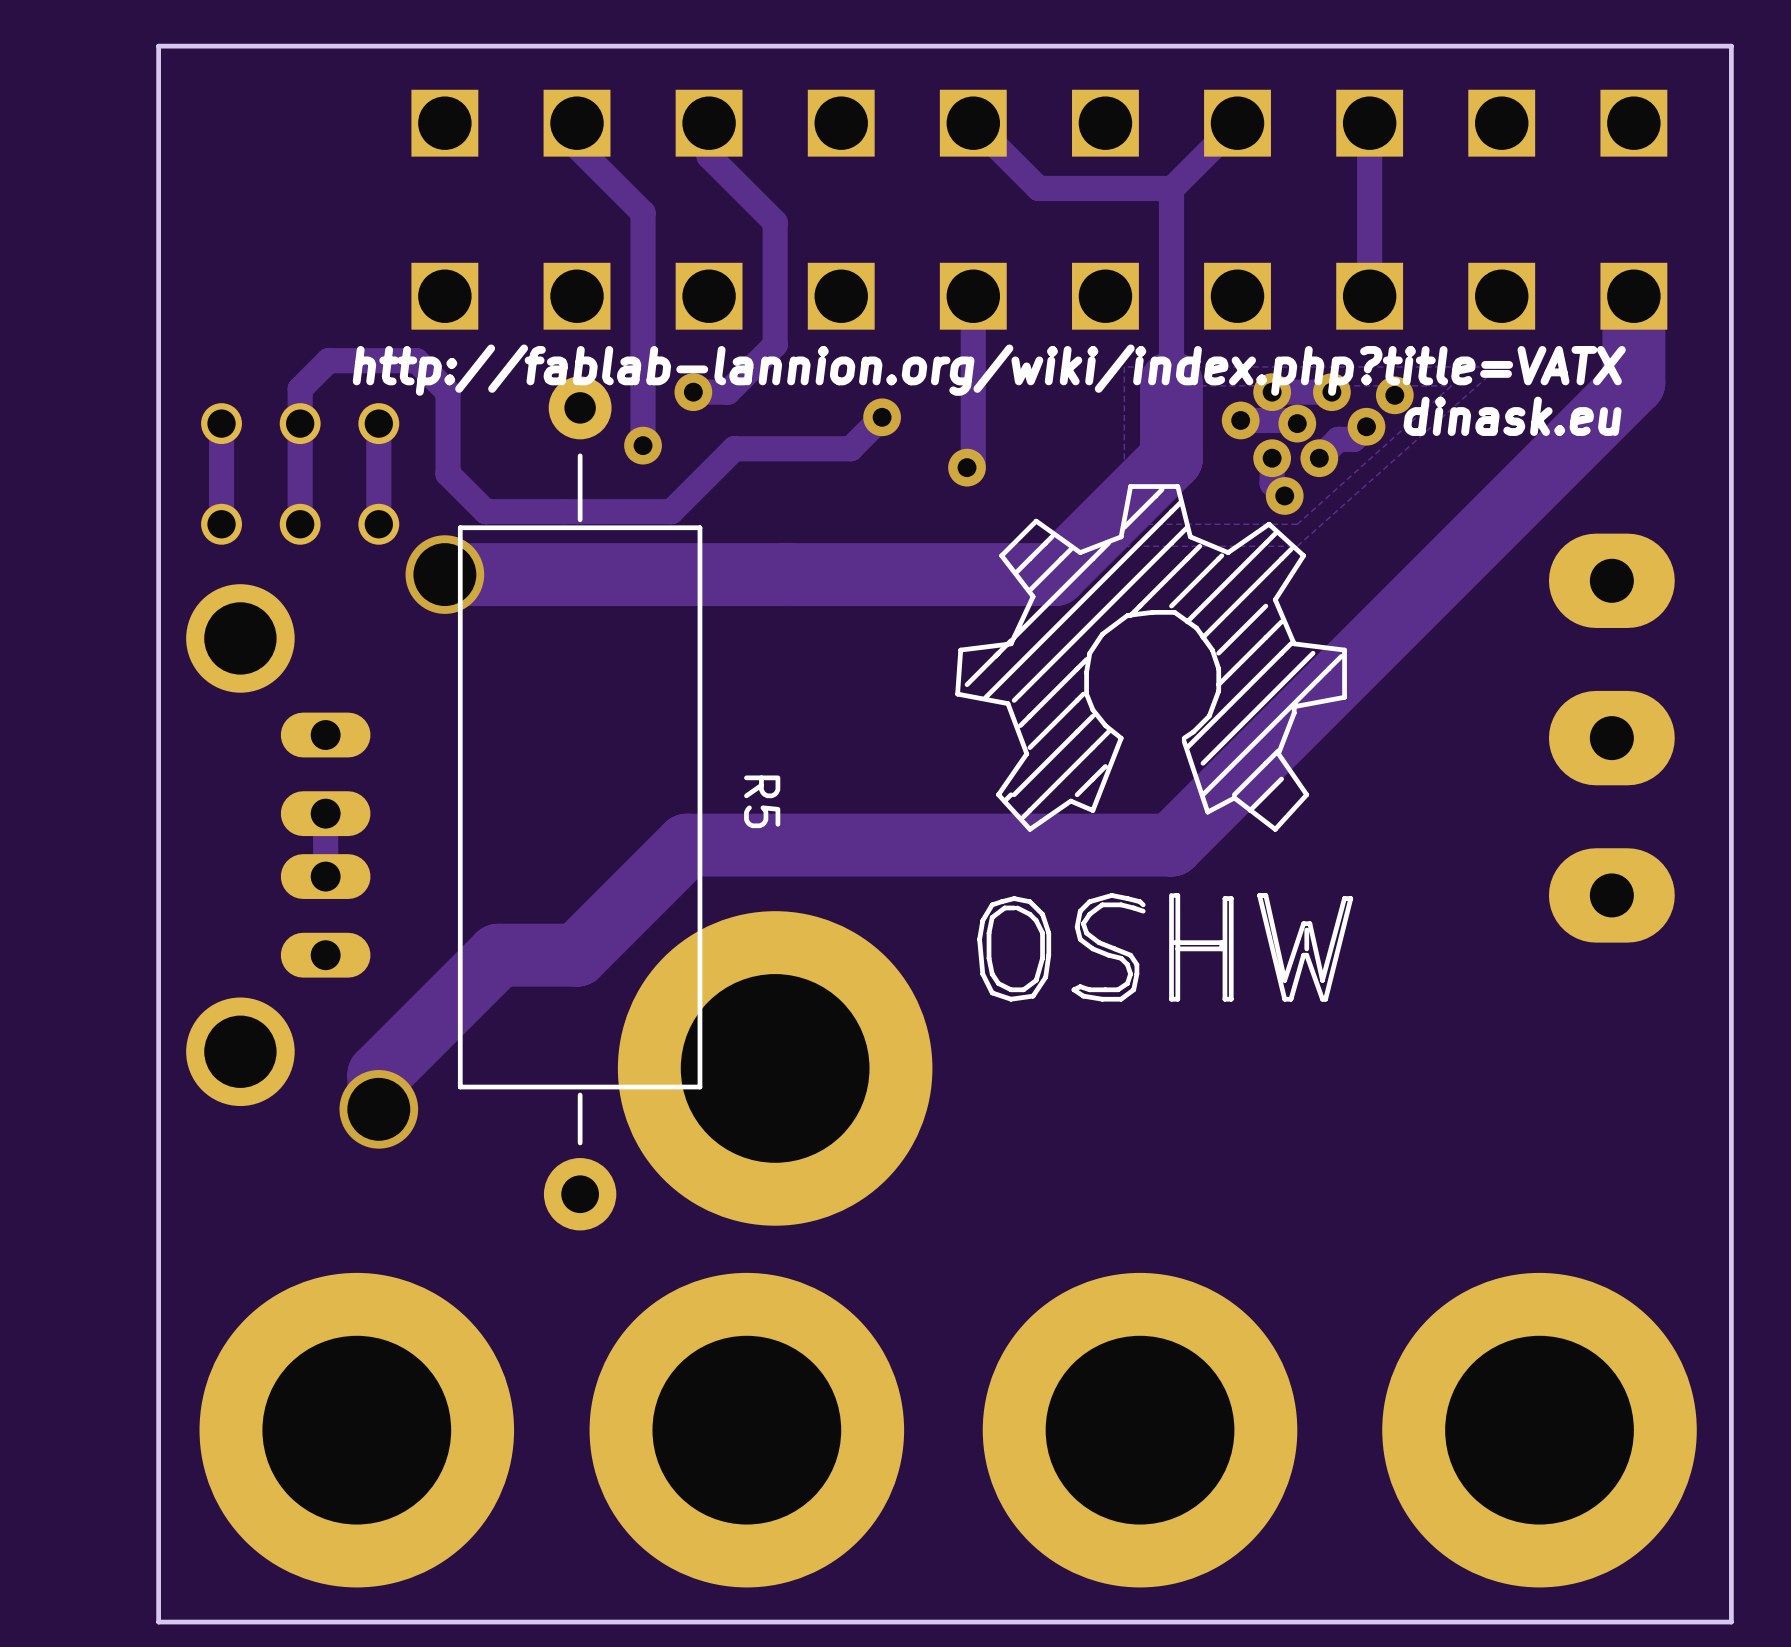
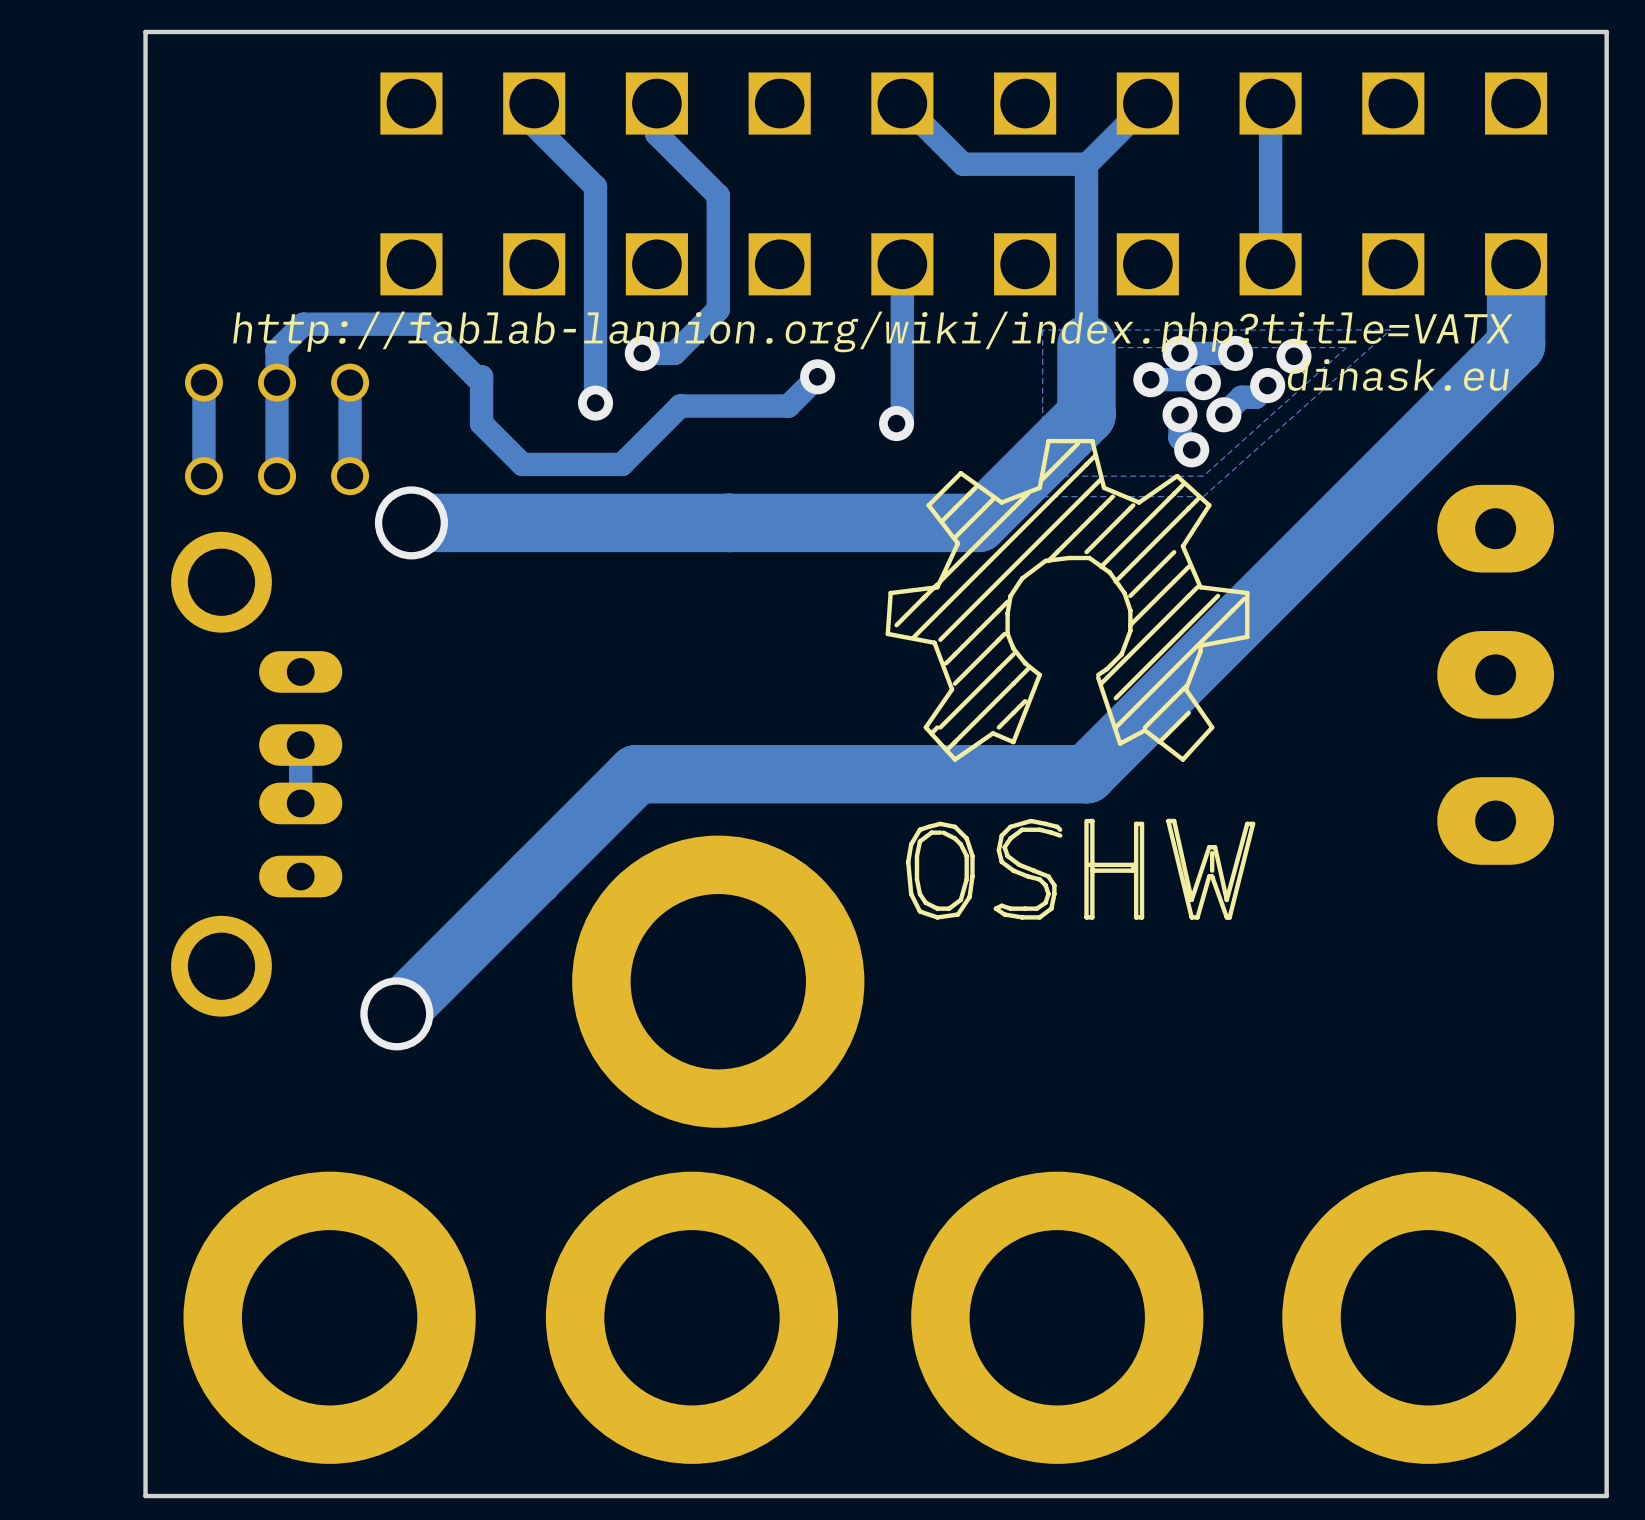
track: (416, 360) (448, 392) (448, 473) (485, 511) (564, 511) -> (385, 324) (423, 324) (475, 376) (481, 376) (481, 423) (522, 464)
R5: (580, 803) -> none
track: (576, 955) (498, 955) (378, 1074) (378, 1109) -> (534, 876) (396, 1013)
via position: (378, 1109) -> (396, 1013)

